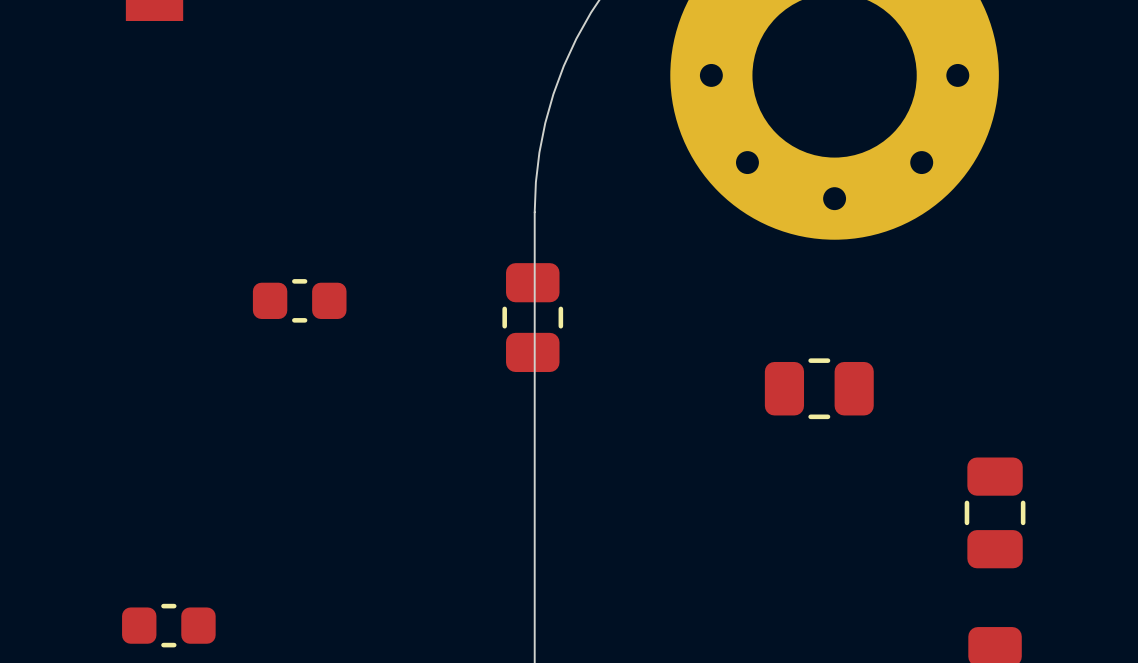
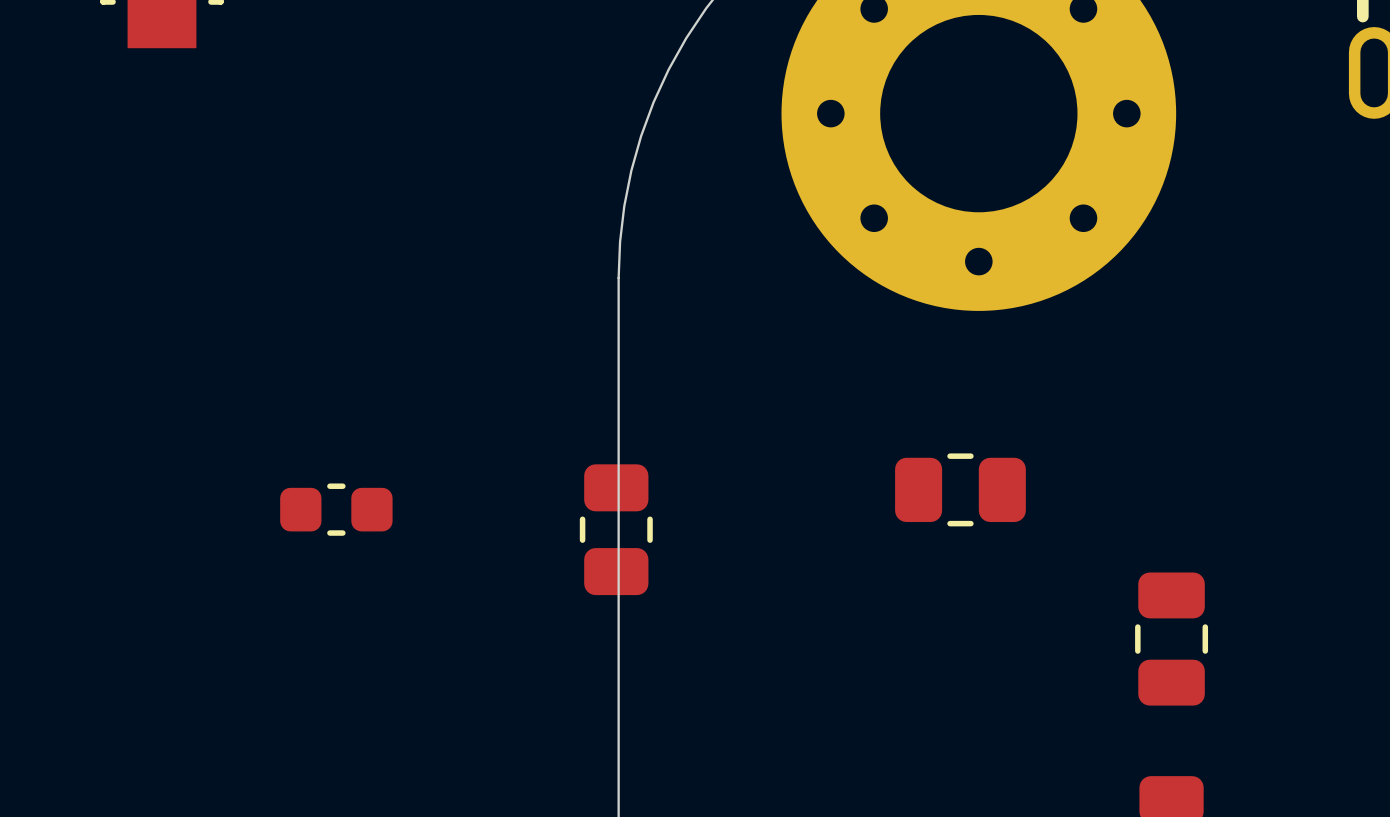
part position: (299, 300) -> (336, 509)
part position: (532, 317) -> (616, 529)
part: (168, 625) -> none

